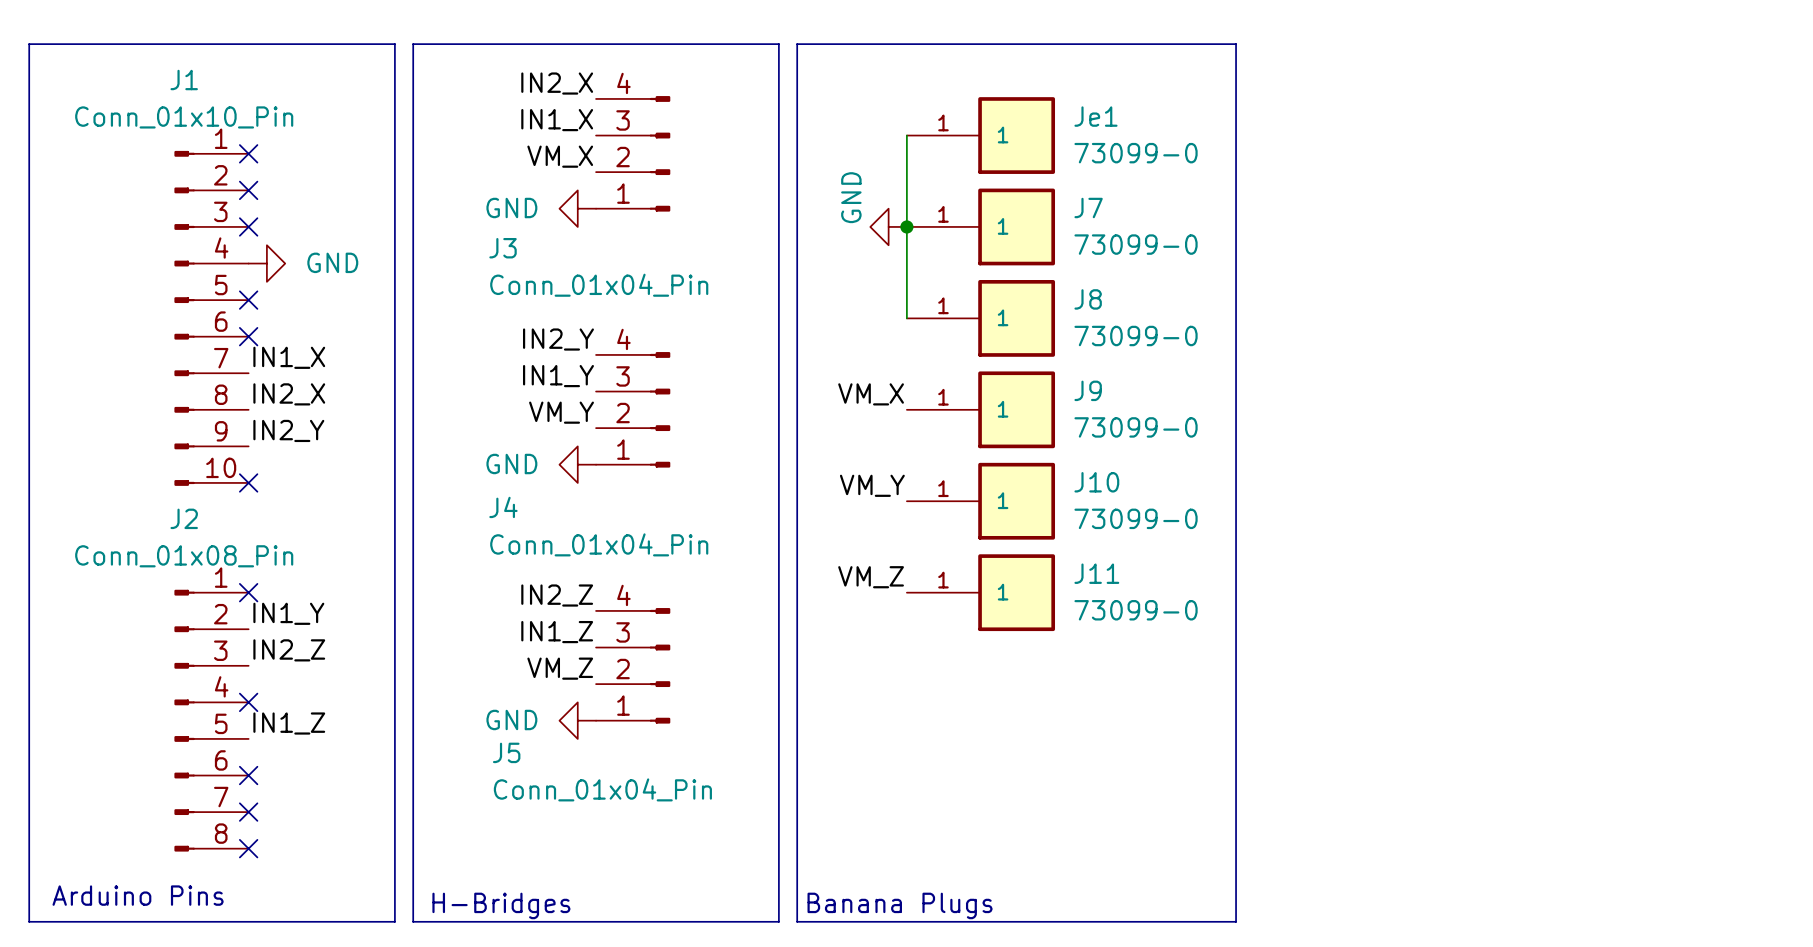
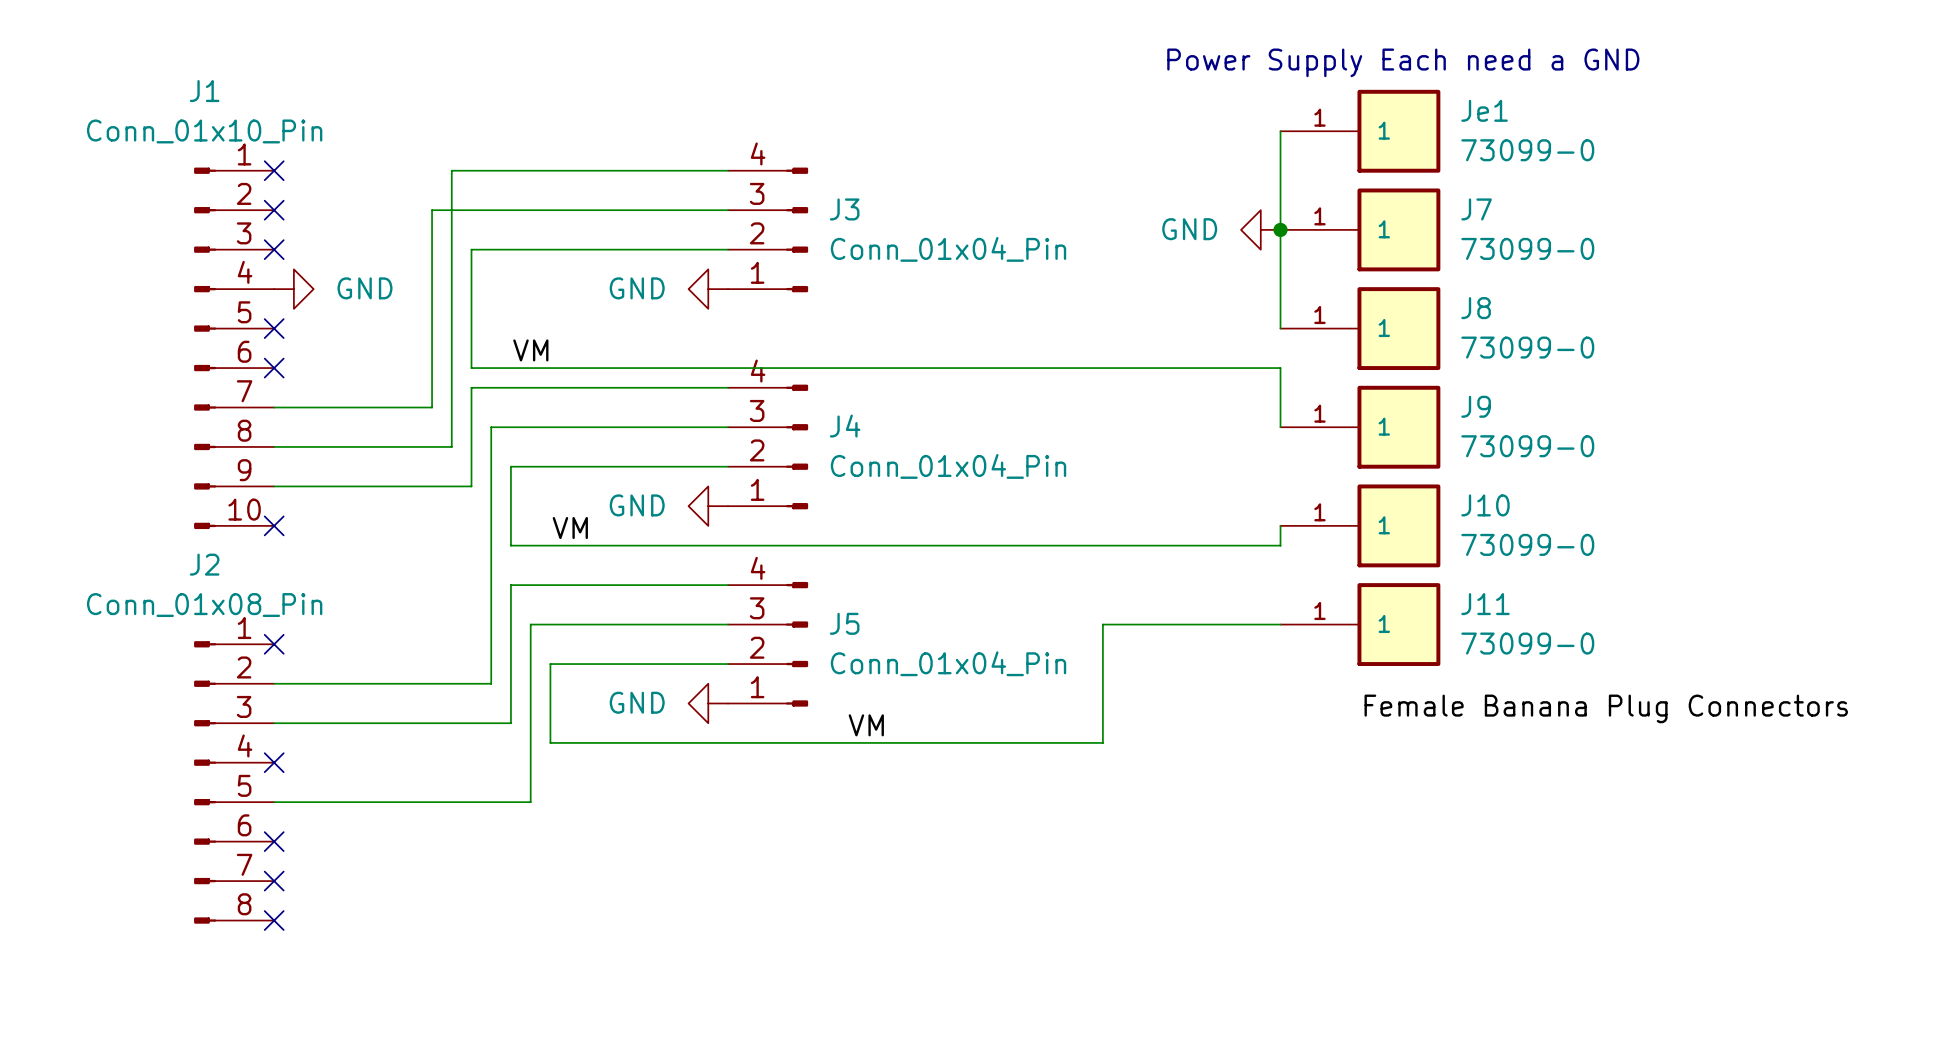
line: (29, 44) (394, 44) (394, 921) (29, 921) (29, 44) -> none
line: (413, 44) (778, 44) (778, 921) (413, 921) (413, 44) -> none
line: (797, 44) (1236, 44) (1236, 921) (797, 921) (797, 44) -> none
text: none -> Power Supply Each need a GND (1403, 62)
label: IN2_X (557, 83) -> none
label: IN1_X (557, 120) -> none
wire: (906, 135) (906, 318) -> (1280, 131) (1280, 328)
Je1 position: (980, 135) -> (1360, 131)
J3 position: (633, 153) -> (768, 229)
wire: none -> (728, 170) (451, 170) (451, 446) (274, 446)
label: VM_X (560, 156) -> none
wire: none -> (728, 210) (432, 210) (432, 407) (274, 407)
power symbol position: GND (577, 208) -> GND (708, 289)
power symbol: none -> GND (1260, 229)
junction: none -> (1280, 229)
wire: none -> (728, 249) (471, 249) (471, 368) (1280, 368) (1280, 427)
power symbol: GND (888, 226) -> none
junction: (906, 226) -> none
J7 position: (980, 226) -> (1360, 229)
J3 name position: J3 (503, 248) -> J3 (844, 209)
J3 value position: Conn_01x04_Pin (599, 285) -> Conn_01x04_Pin (948, 249)
J8 position: (980, 318) -> (1360, 328)
label: none -> VM (530, 350)
label: IN2_Y (558, 339) -> none
wire: none -> (728, 387) (471, 387) (471, 486) (274, 486)
label: IN1_X (289, 357) -> none
label: IN1_Y (558, 376) -> none
wire: none -> (728, 427) (491, 427) (491, 683) (274, 683)
label: IN2_X (289, 394) -> none
label: VM_X (871, 394) -> none
J4 position: (633, 409) -> (768, 446)
J9 position: (980, 409) -> (1360, 427)
label: VM_Y (561, 412) -> none
wire: none -> (728, 466) (510, 466) (510, 545) (1280, 545) (1280, 525)
label: IN2_Y (288, 430) -> none
power symbol position: GND (577, 464) -> GND (708, 506)
label: none -> VM (570, 528)
label: VM_Y (872, 485) -> none
J10 position: (980, 501) -> (1360, 525)
J4 name position: J4 (503, 507) -> J4 (845, 426)
wire: none -> (728, 585) (510, 585) (510, 723) (274, 723)
J4 value position: Conn_01x04_Pin (599, 544) -> Conn_01x04_Pin (948, 466)
wire: none -> (728, 624) (530, 624) (530, 802) (274, 802)
wire: none -> (1280, 624) (1102, 624) (1102, 742) (550, 742) (550, 664) (728, 664)
label: VM_Z (871, 577) -> none
J11 position: (980, 592) -> (1360, 624)
label: IN2_Z (557, 595) -> none
label: IN1_Y (288, 613) -> none
label: IN1_Z (557, 632) -> none
power symbol: none -> GND (708, 703)
label: IN2_Z (289, 650) -> none
label: none -> Female Banana Plug Connectors (1606, 708)
J5 position: (633, 665) -> (768, 644)
label: none -> VM (866, 725)
label: VM_Z (560, 668) -> none
power symbol: GND (577, 720) -> none
label: IN1_Z (289, 723) -> none
J5 name position: J5 (506, 752) -> J5 (844, 623)
J5 value position: Conn_01x04_Pin (602, 789) -> Conn_01x04_Pin (948, 663)
text: Arduino Pins (138, 895) -> none
text: H-Bridges (501, 905) -> none
text: Banana Plugs (900, 905) -> none

